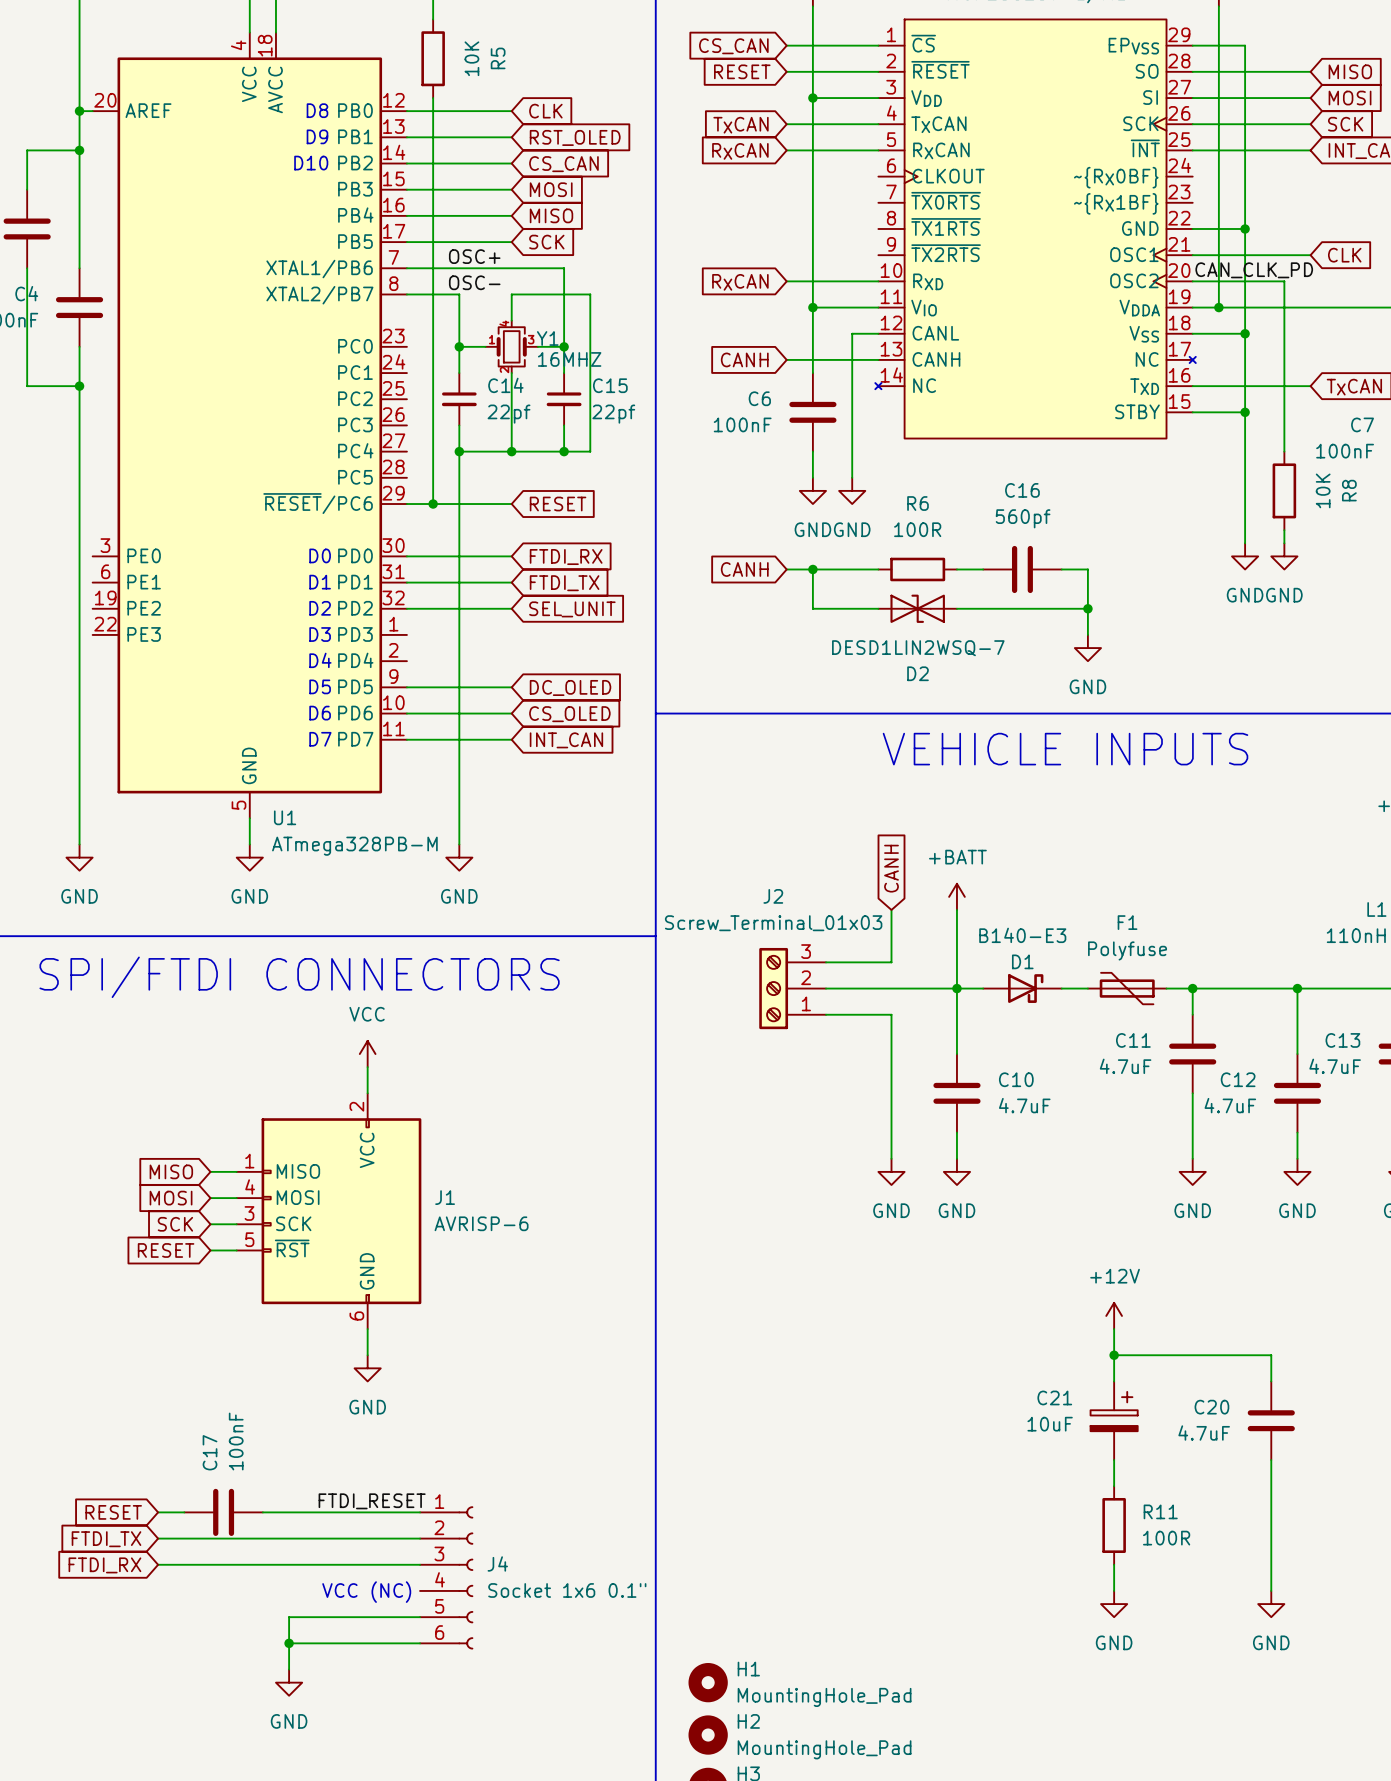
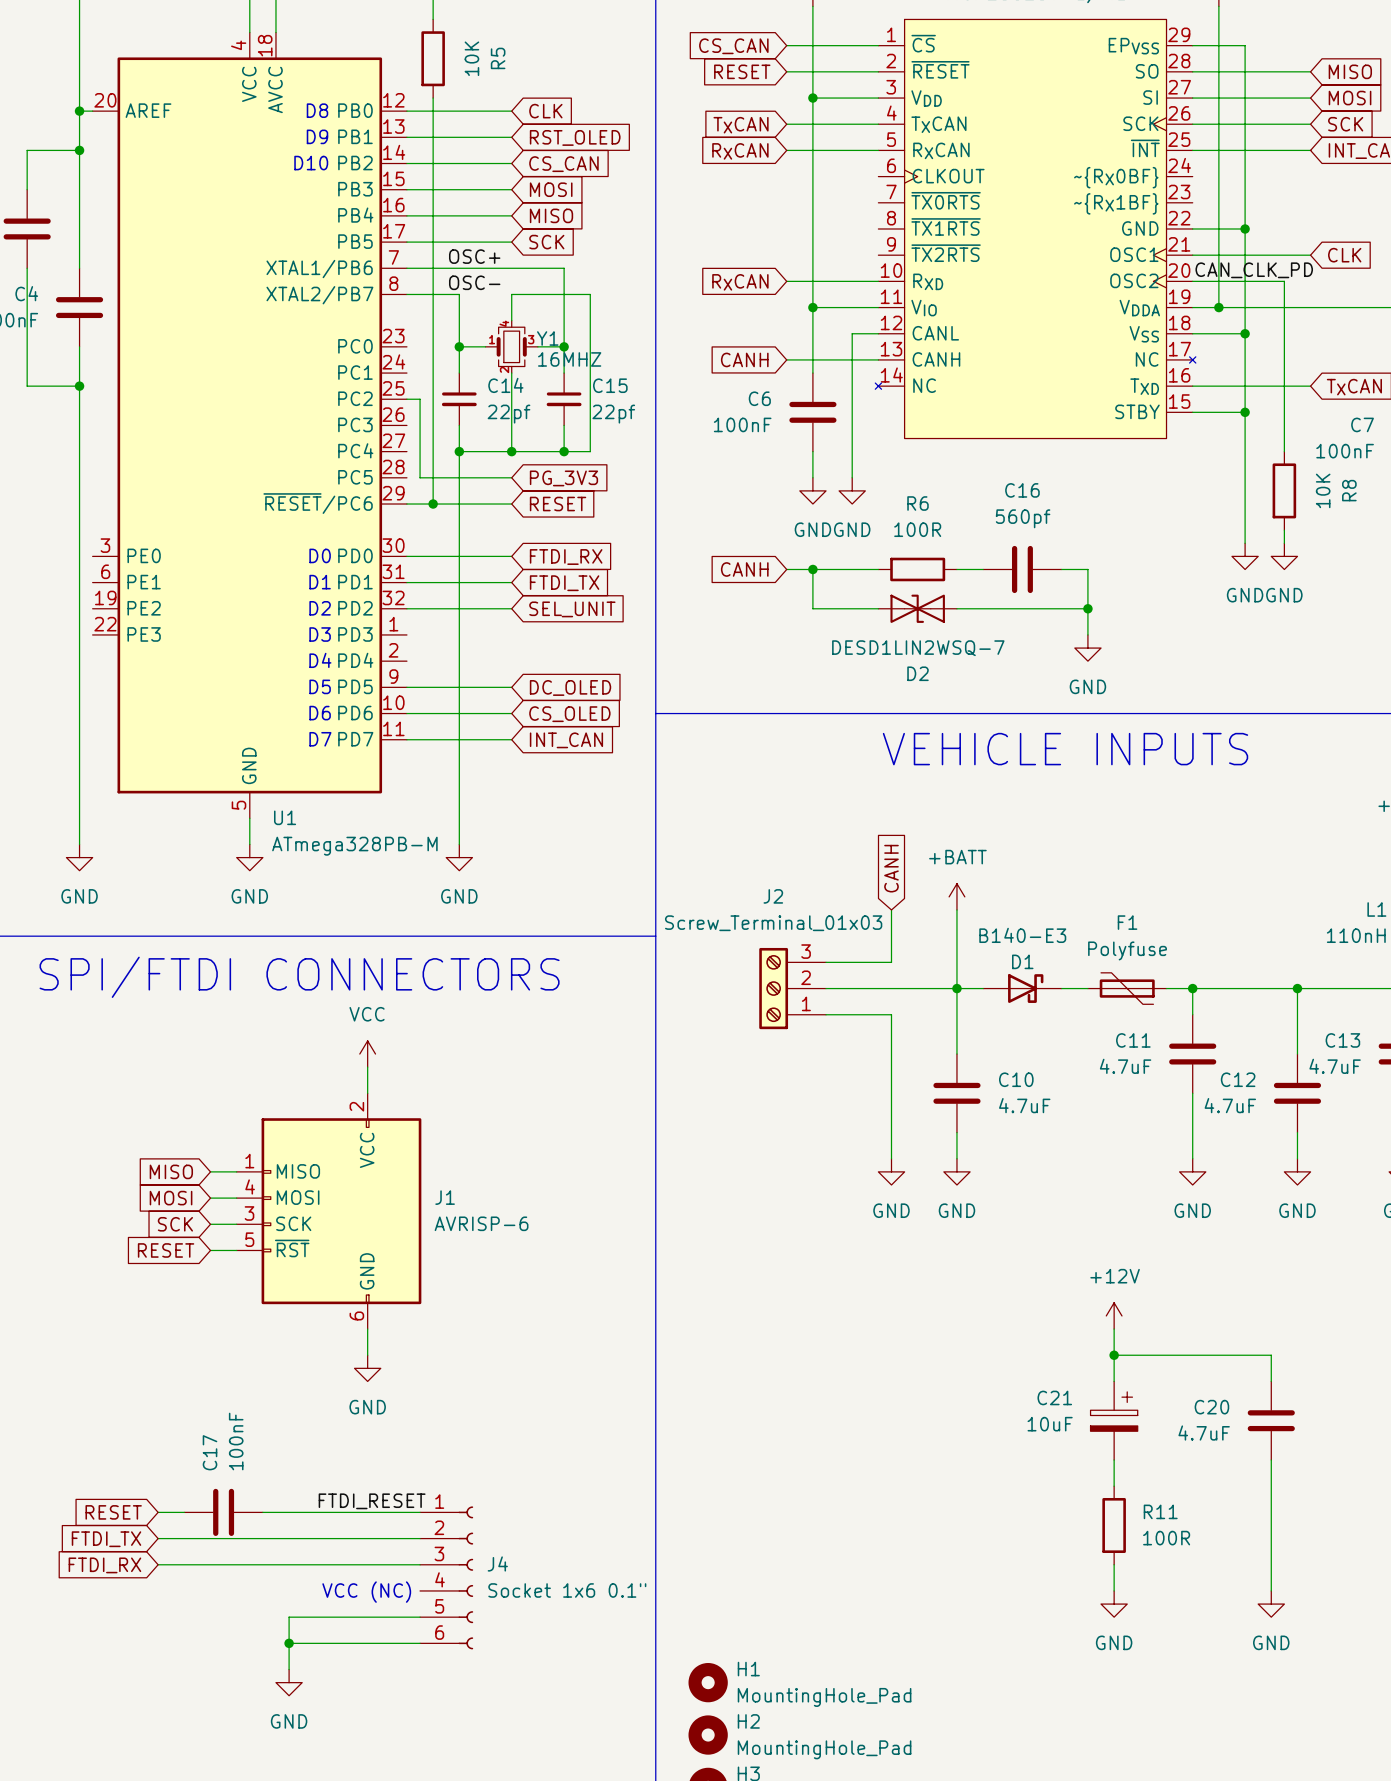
wire: none -> (406, 399) (420, 399) (420, 477) (511, 477)
global label: none -> PG_3V3 (563, 478)

